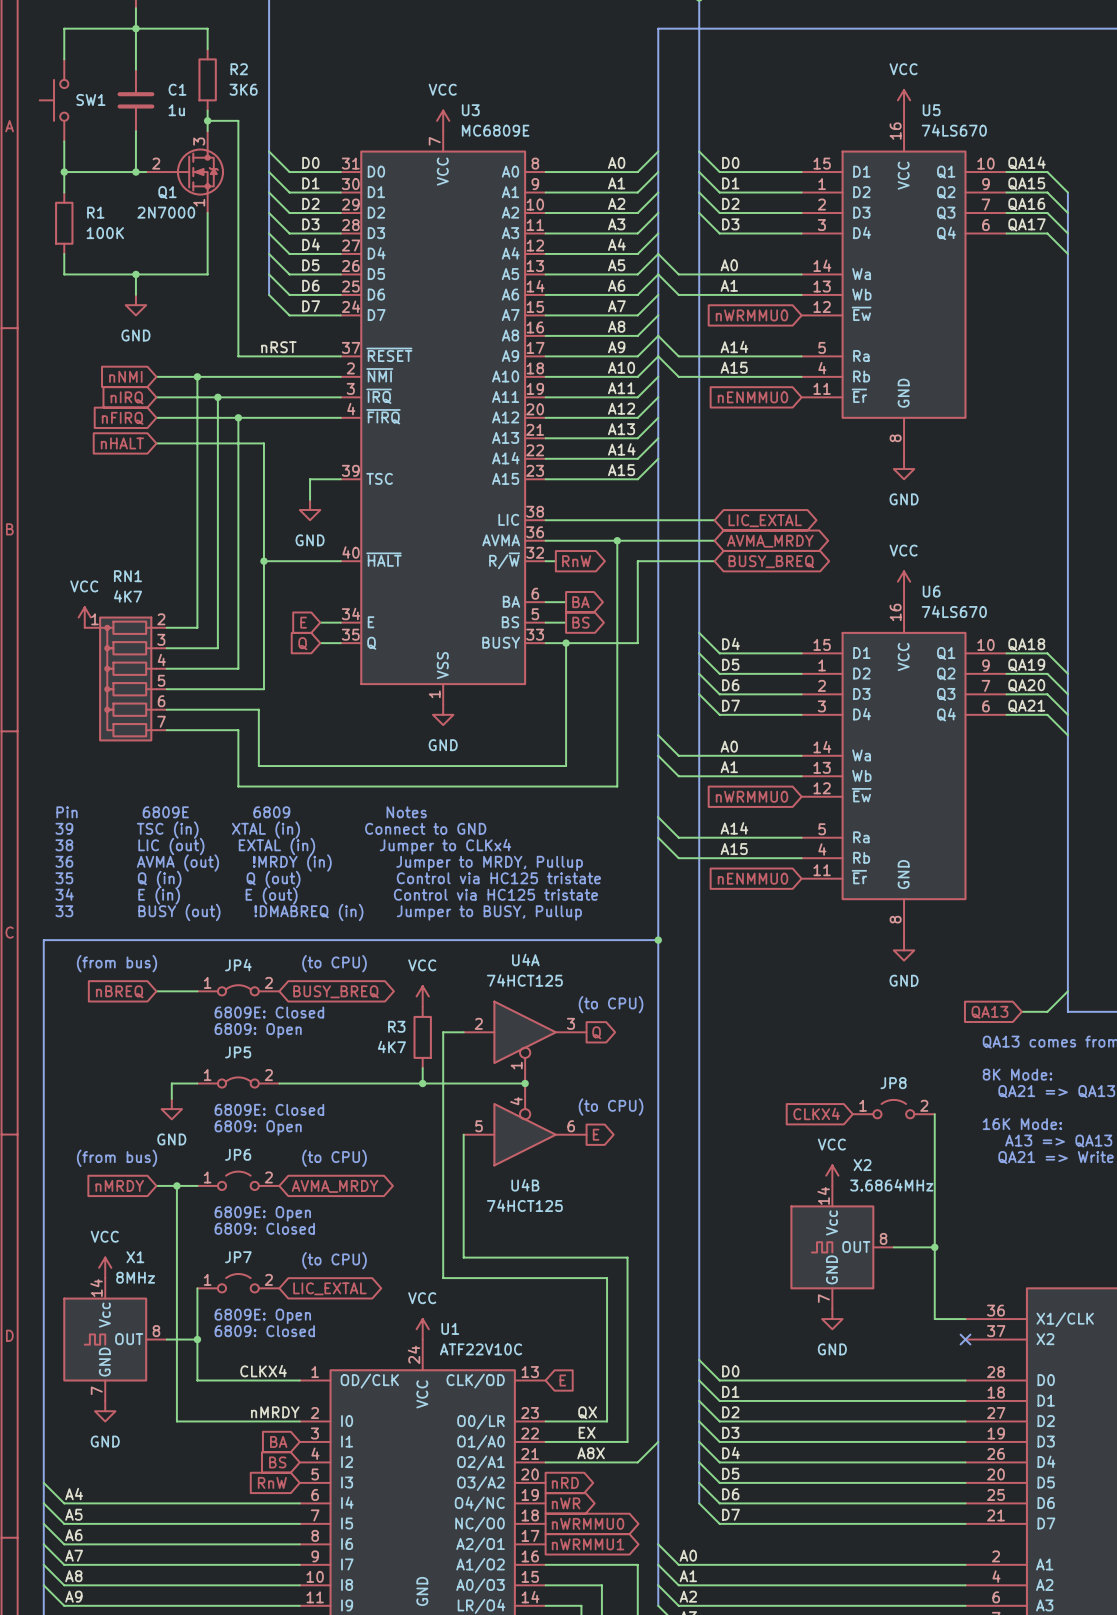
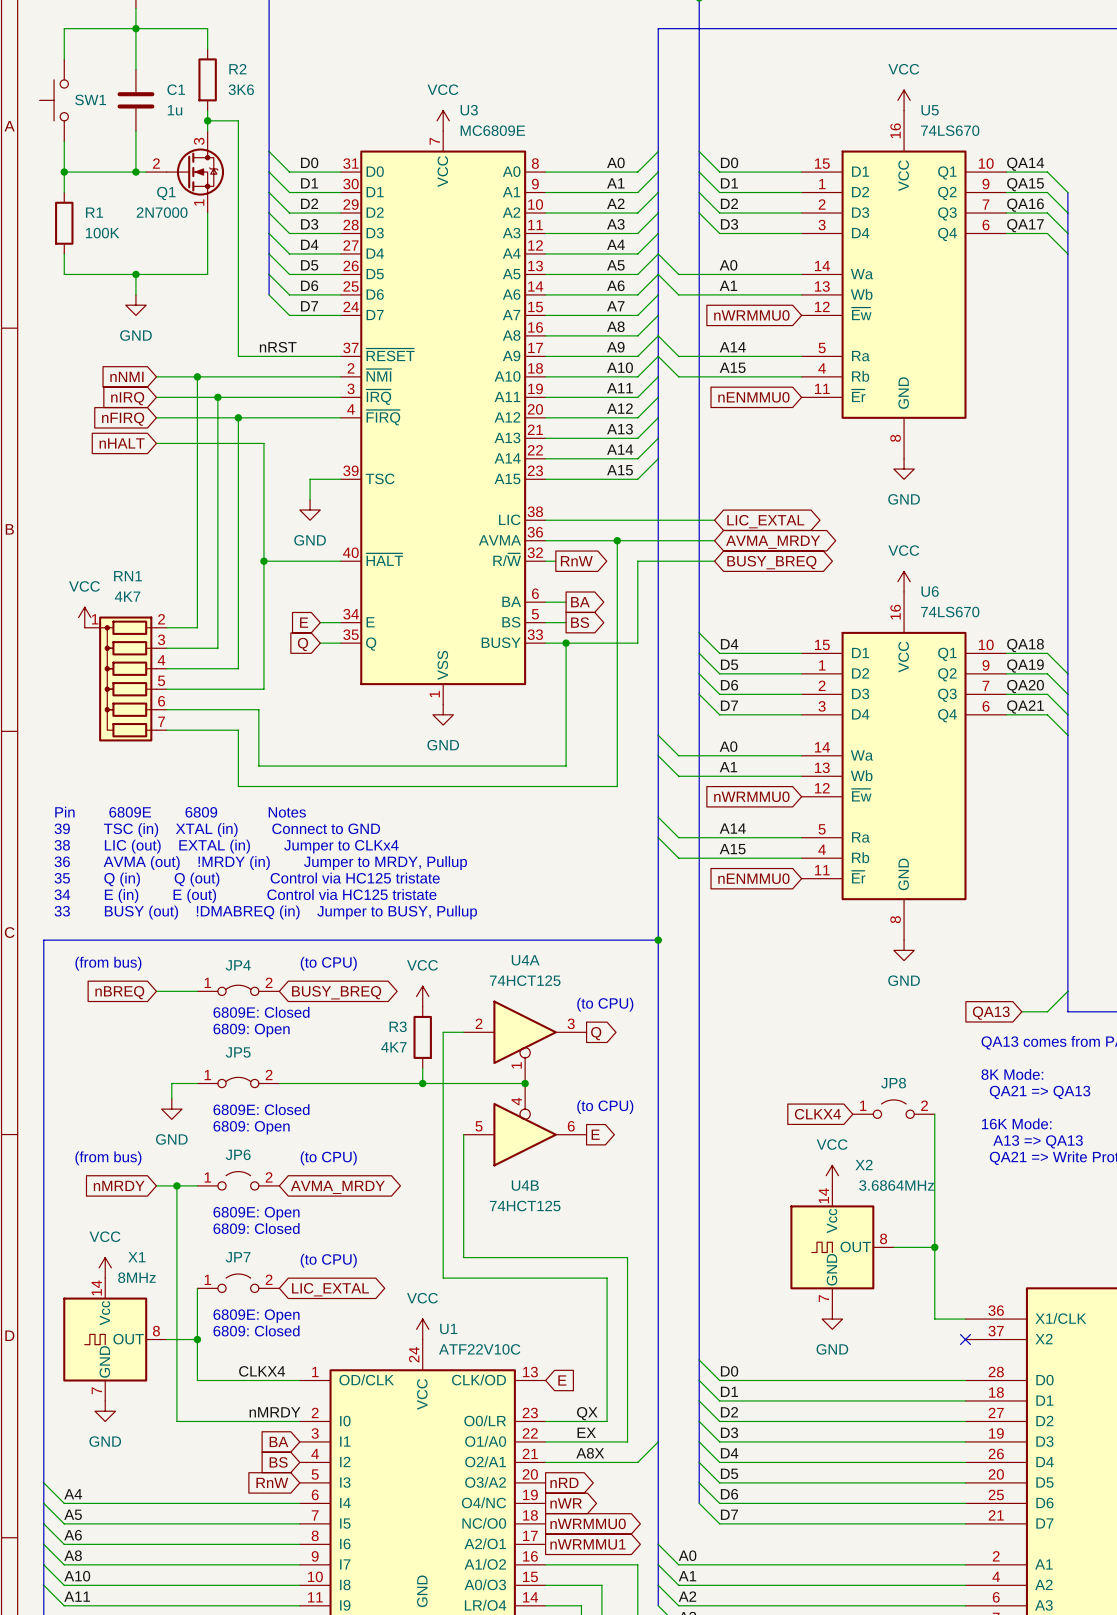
label: A7 (74, 1555) -> A8 (73, 1555)
label: A8 (73, 1576) -> A10 (77, 1576)
label: A9 (73, 1596) -> A11 (77, 1596)

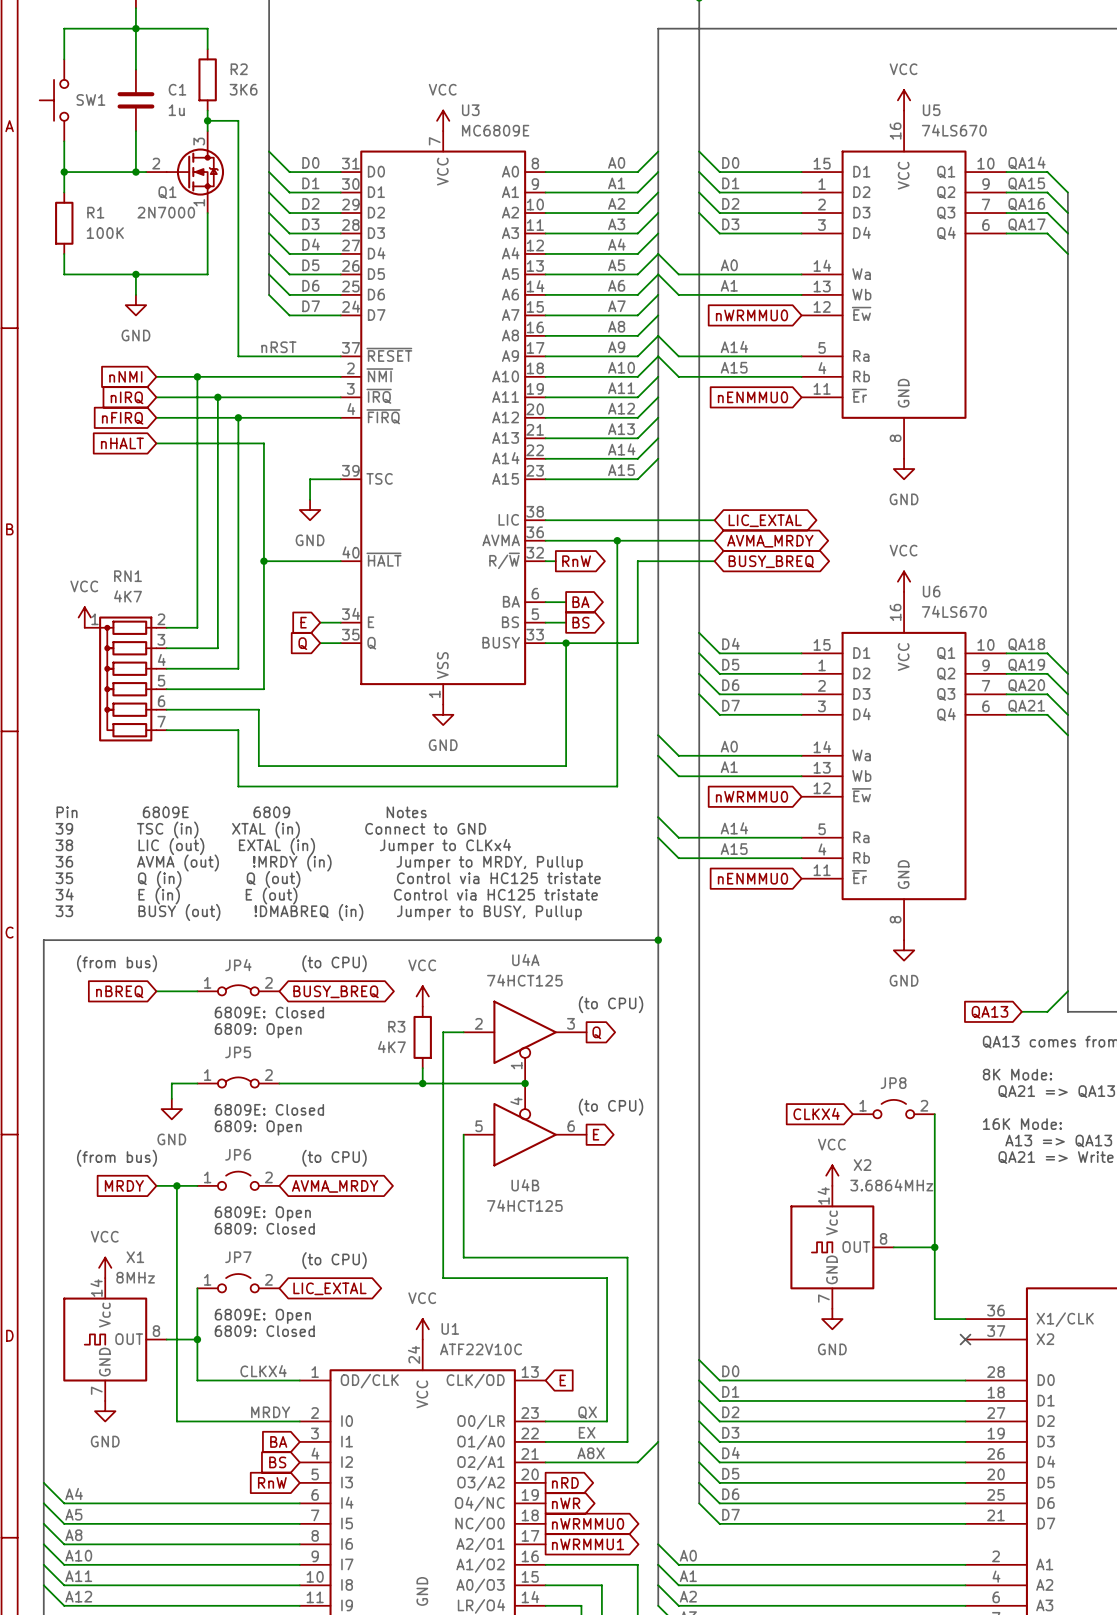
global label: nMRDY (119, 1185) -> MRDY (124, 1185)
label: nMRDY (274, 1412) -> MRDY (270, 1412)
label: A6 (73, 1535) -> A8 (73, 1535)
label: A8 (73, 1555) -> A10 (78, 1555)
label: A10 (77, 1576) -> A11 (78, 1576)
label: A11 (77, 1596) -> A12 (78, 1596)

